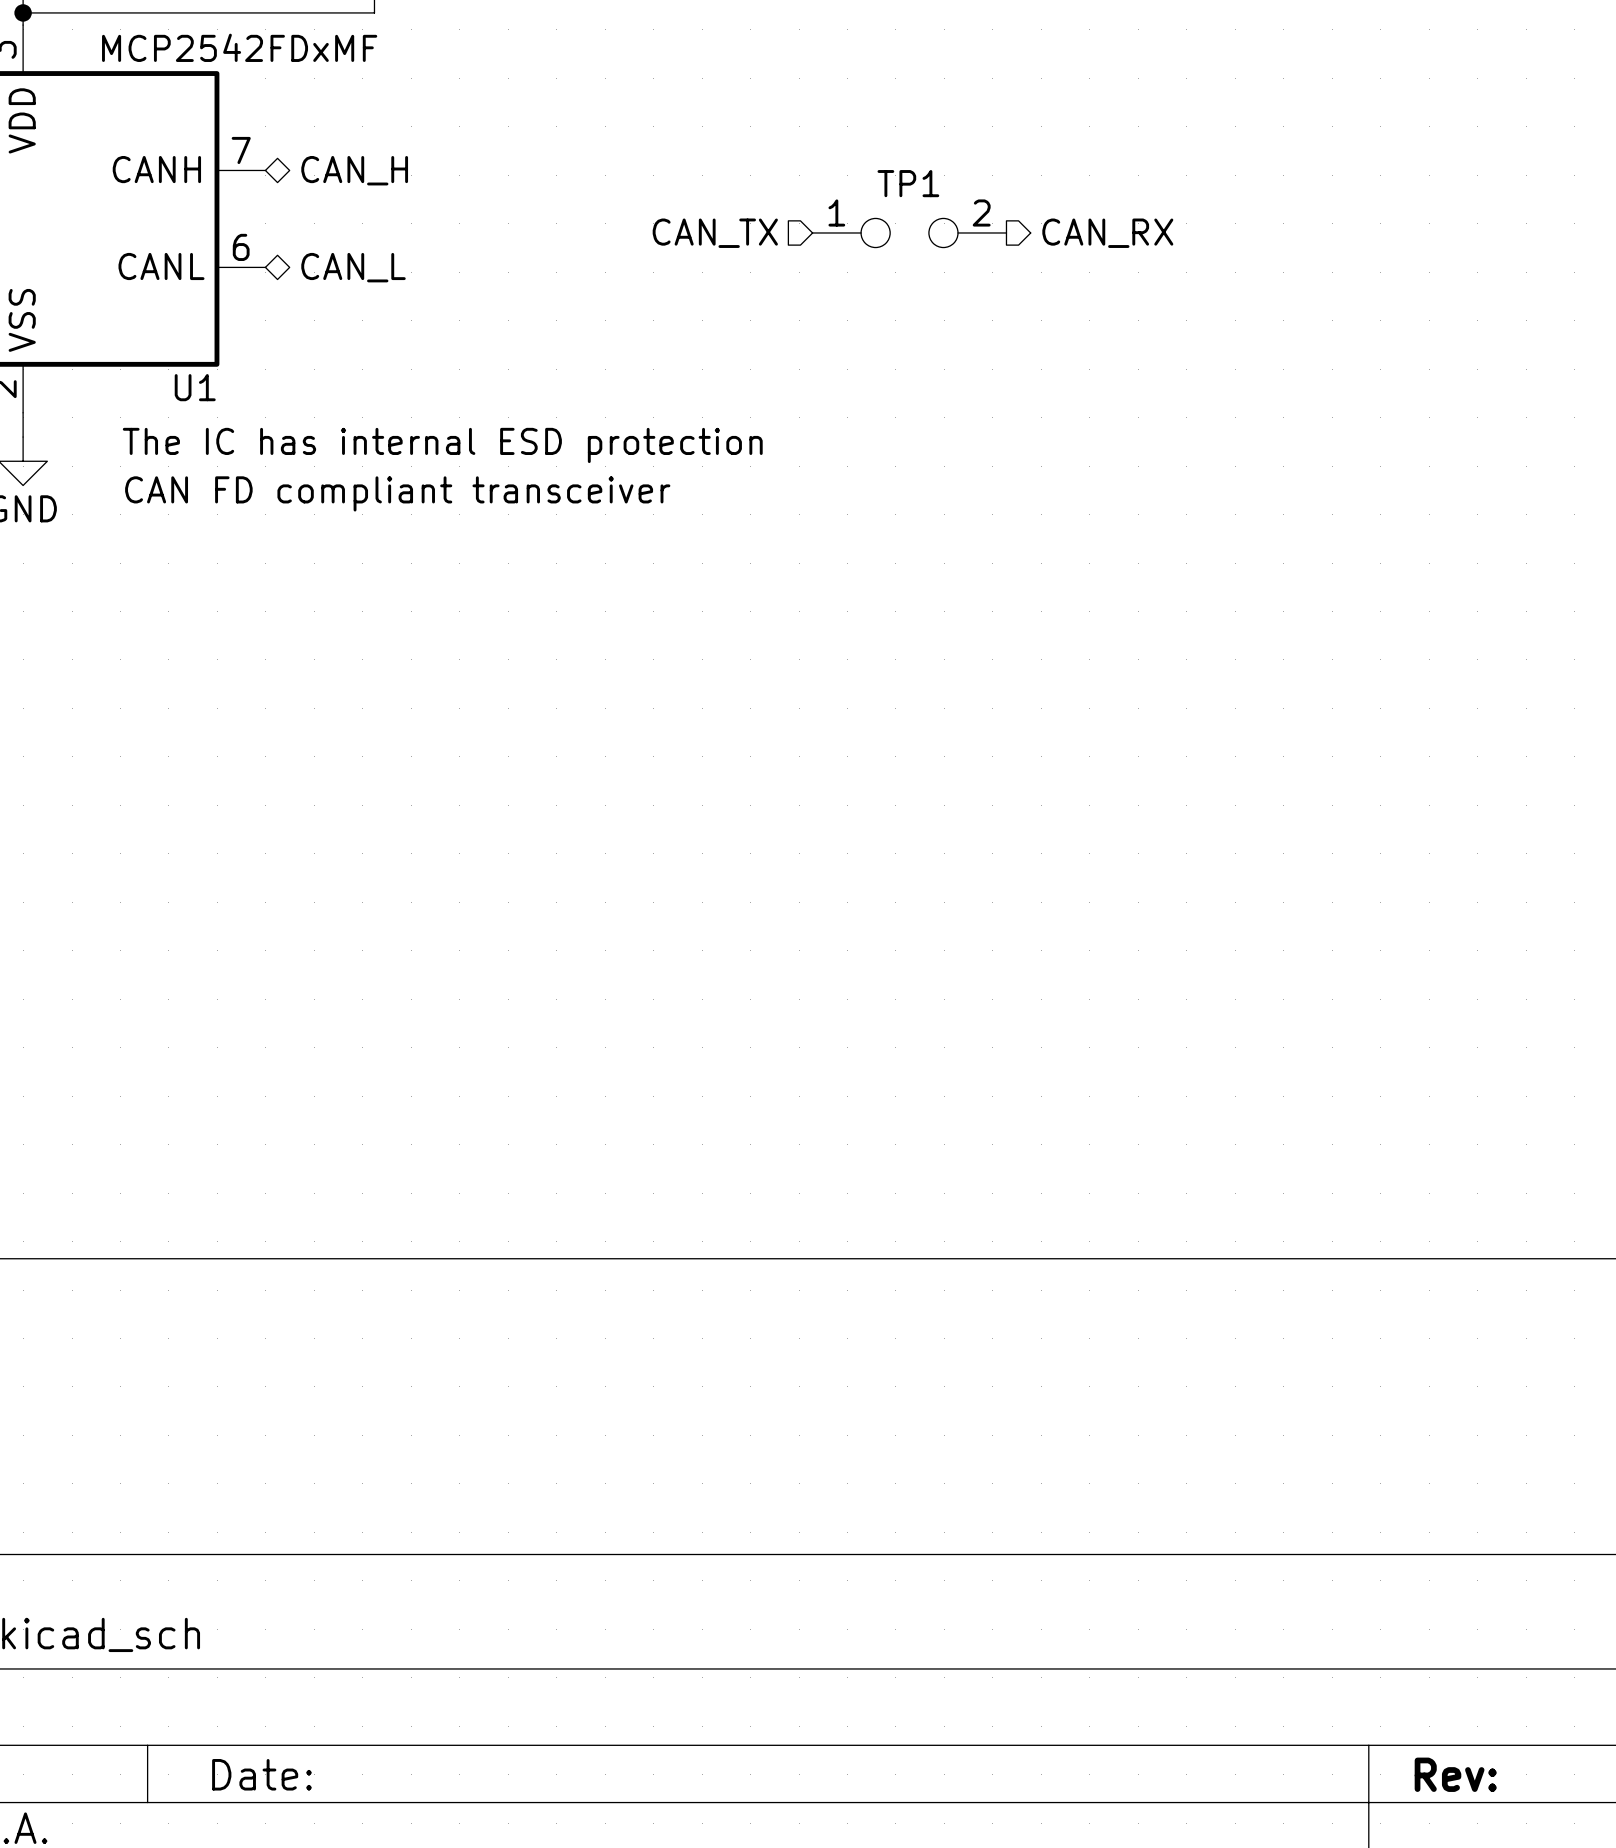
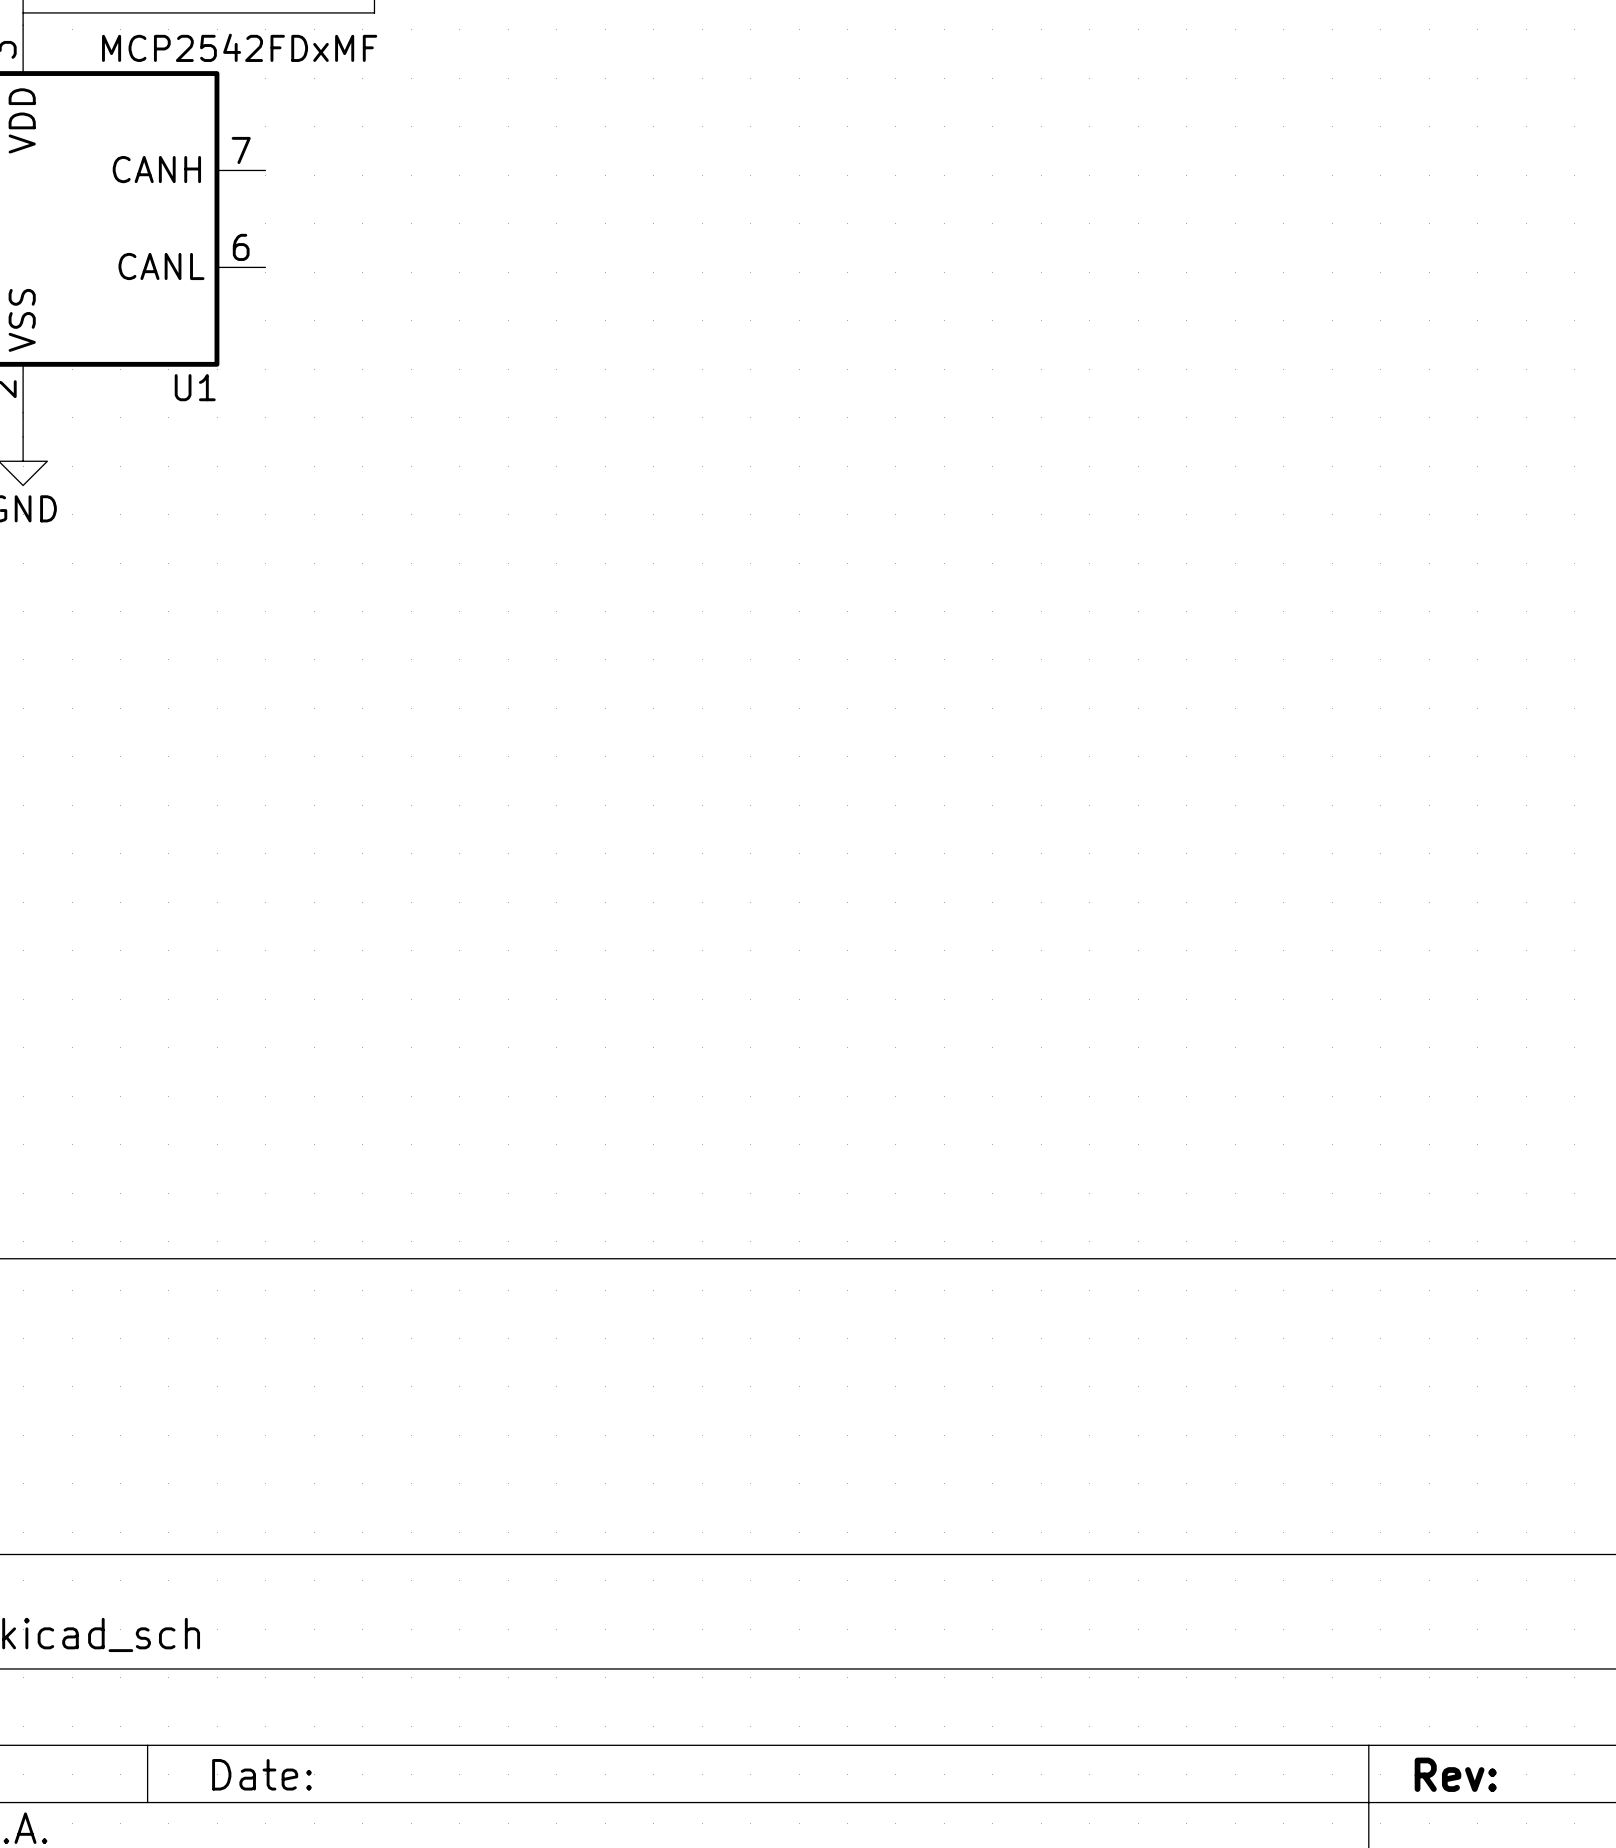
junction: (23, 12) -> none
hierarchical label: CAN_H (354, 170) -> none
TP1: (909, 232) -> none
hierarchical label: CAN_TX (715, 233) -> none
hierarchical label: CAN_RX (1107, 233) -> none
hierarchical label: CAN_L (353, 267) -> none
text: The IC has internal ESD protection (442, 445) -> none
text: CAN FD compliant transceiver (397, 493) -> none

